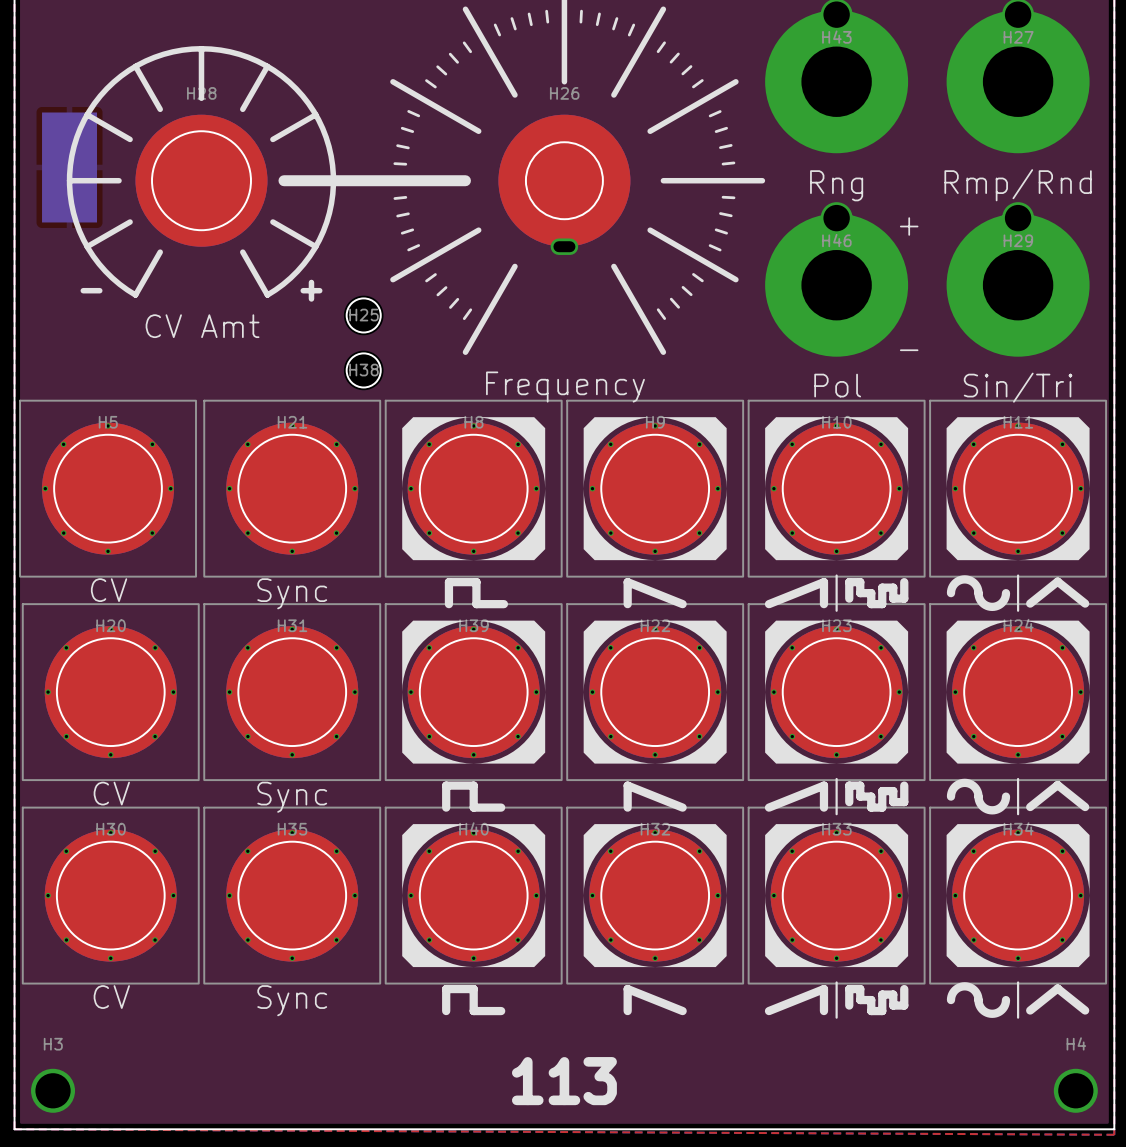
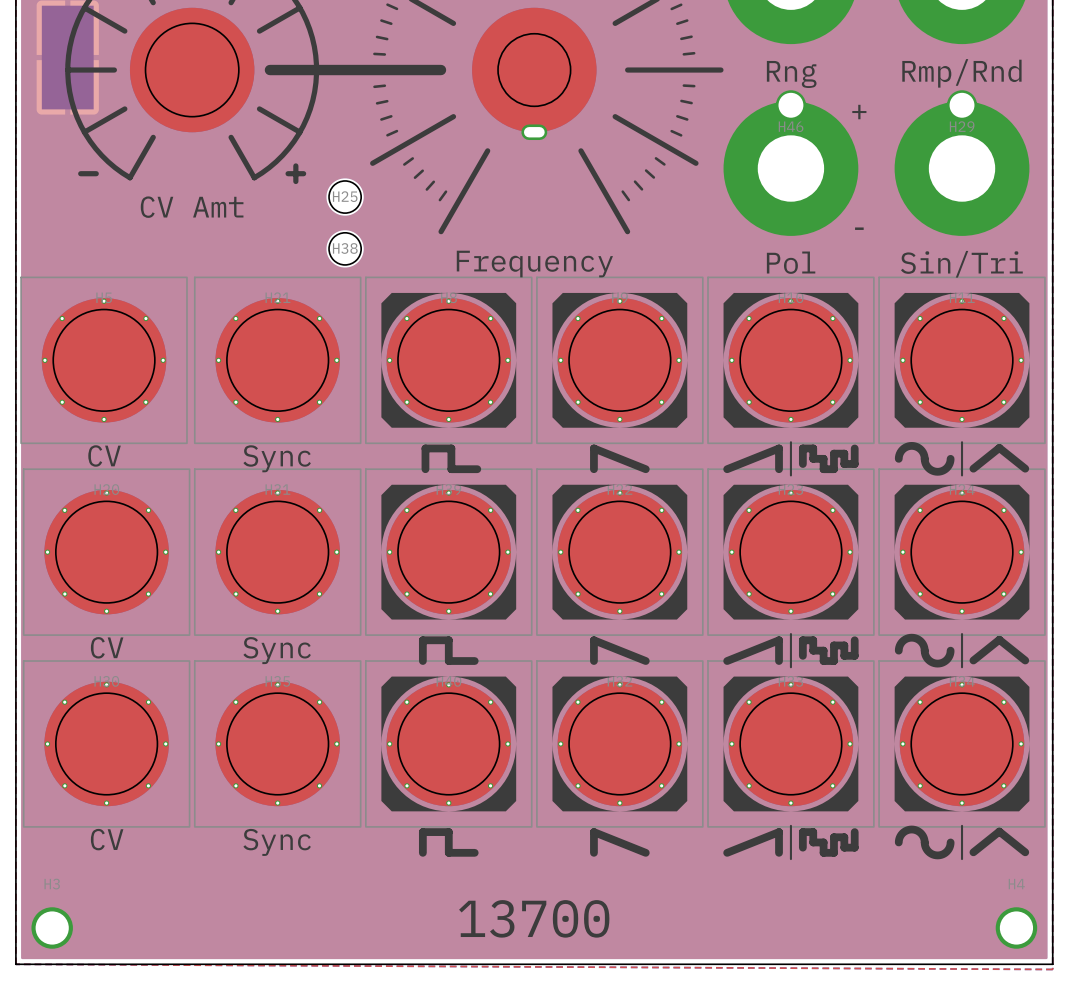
text: 113 (564, 1081) -> 13700 (534, 918)

